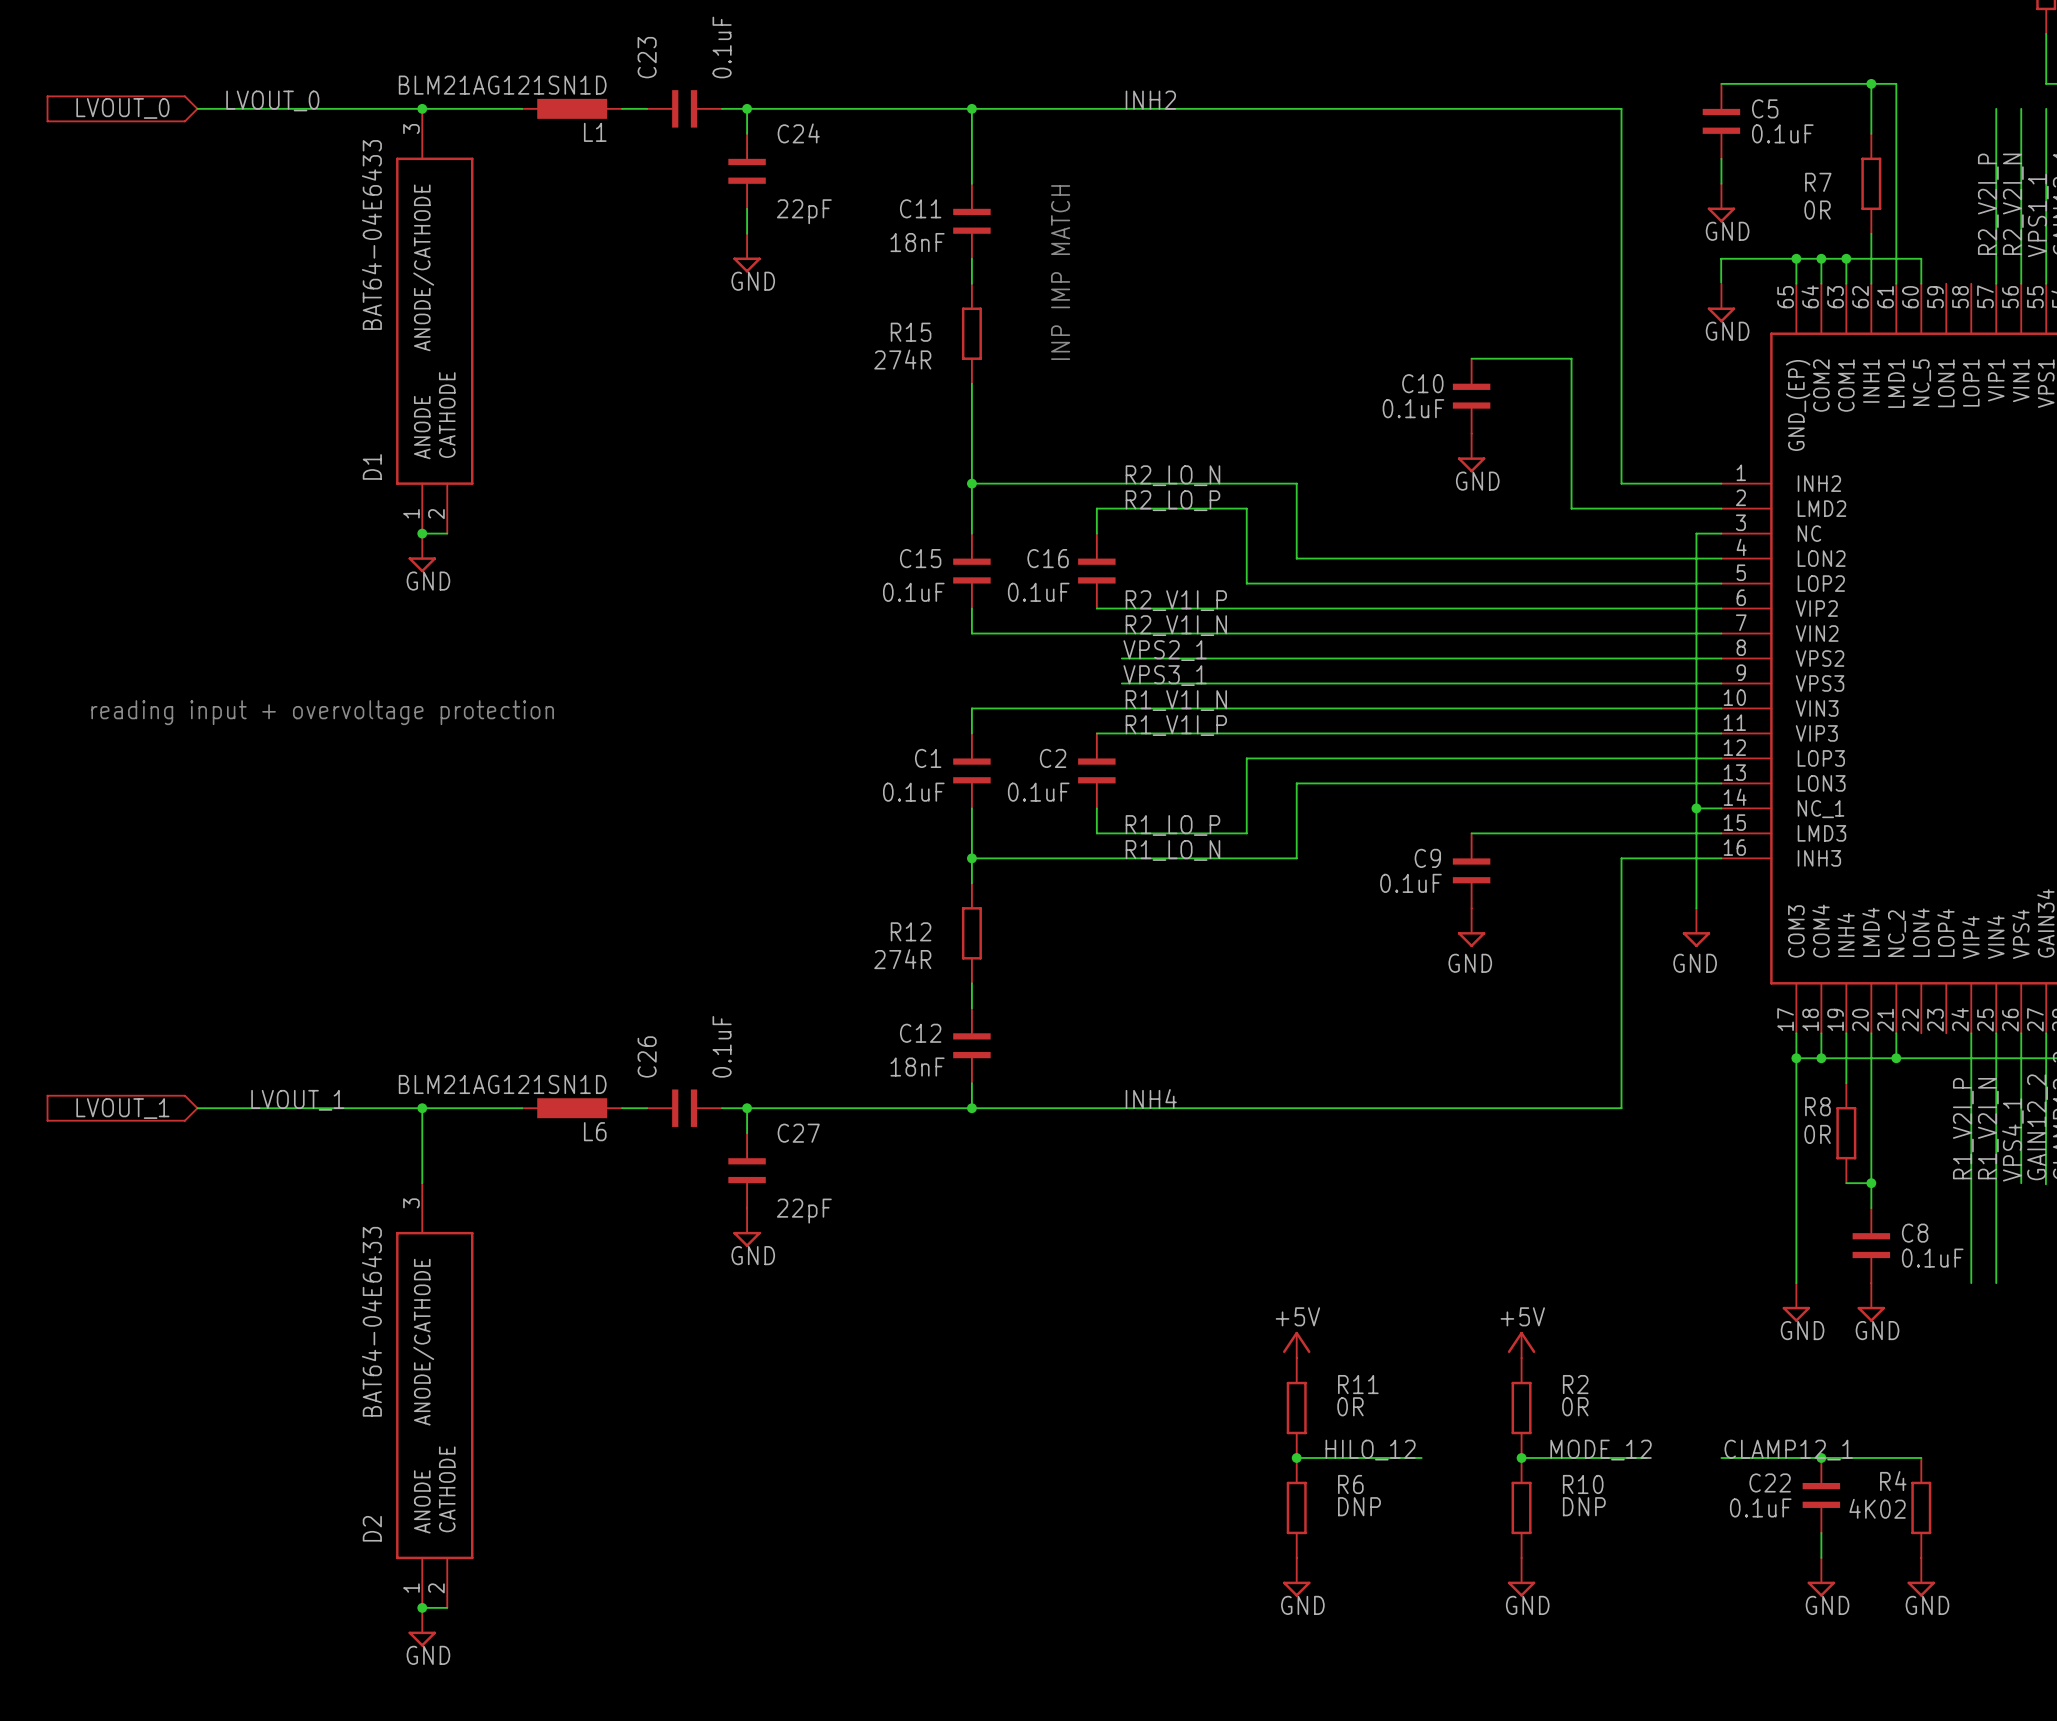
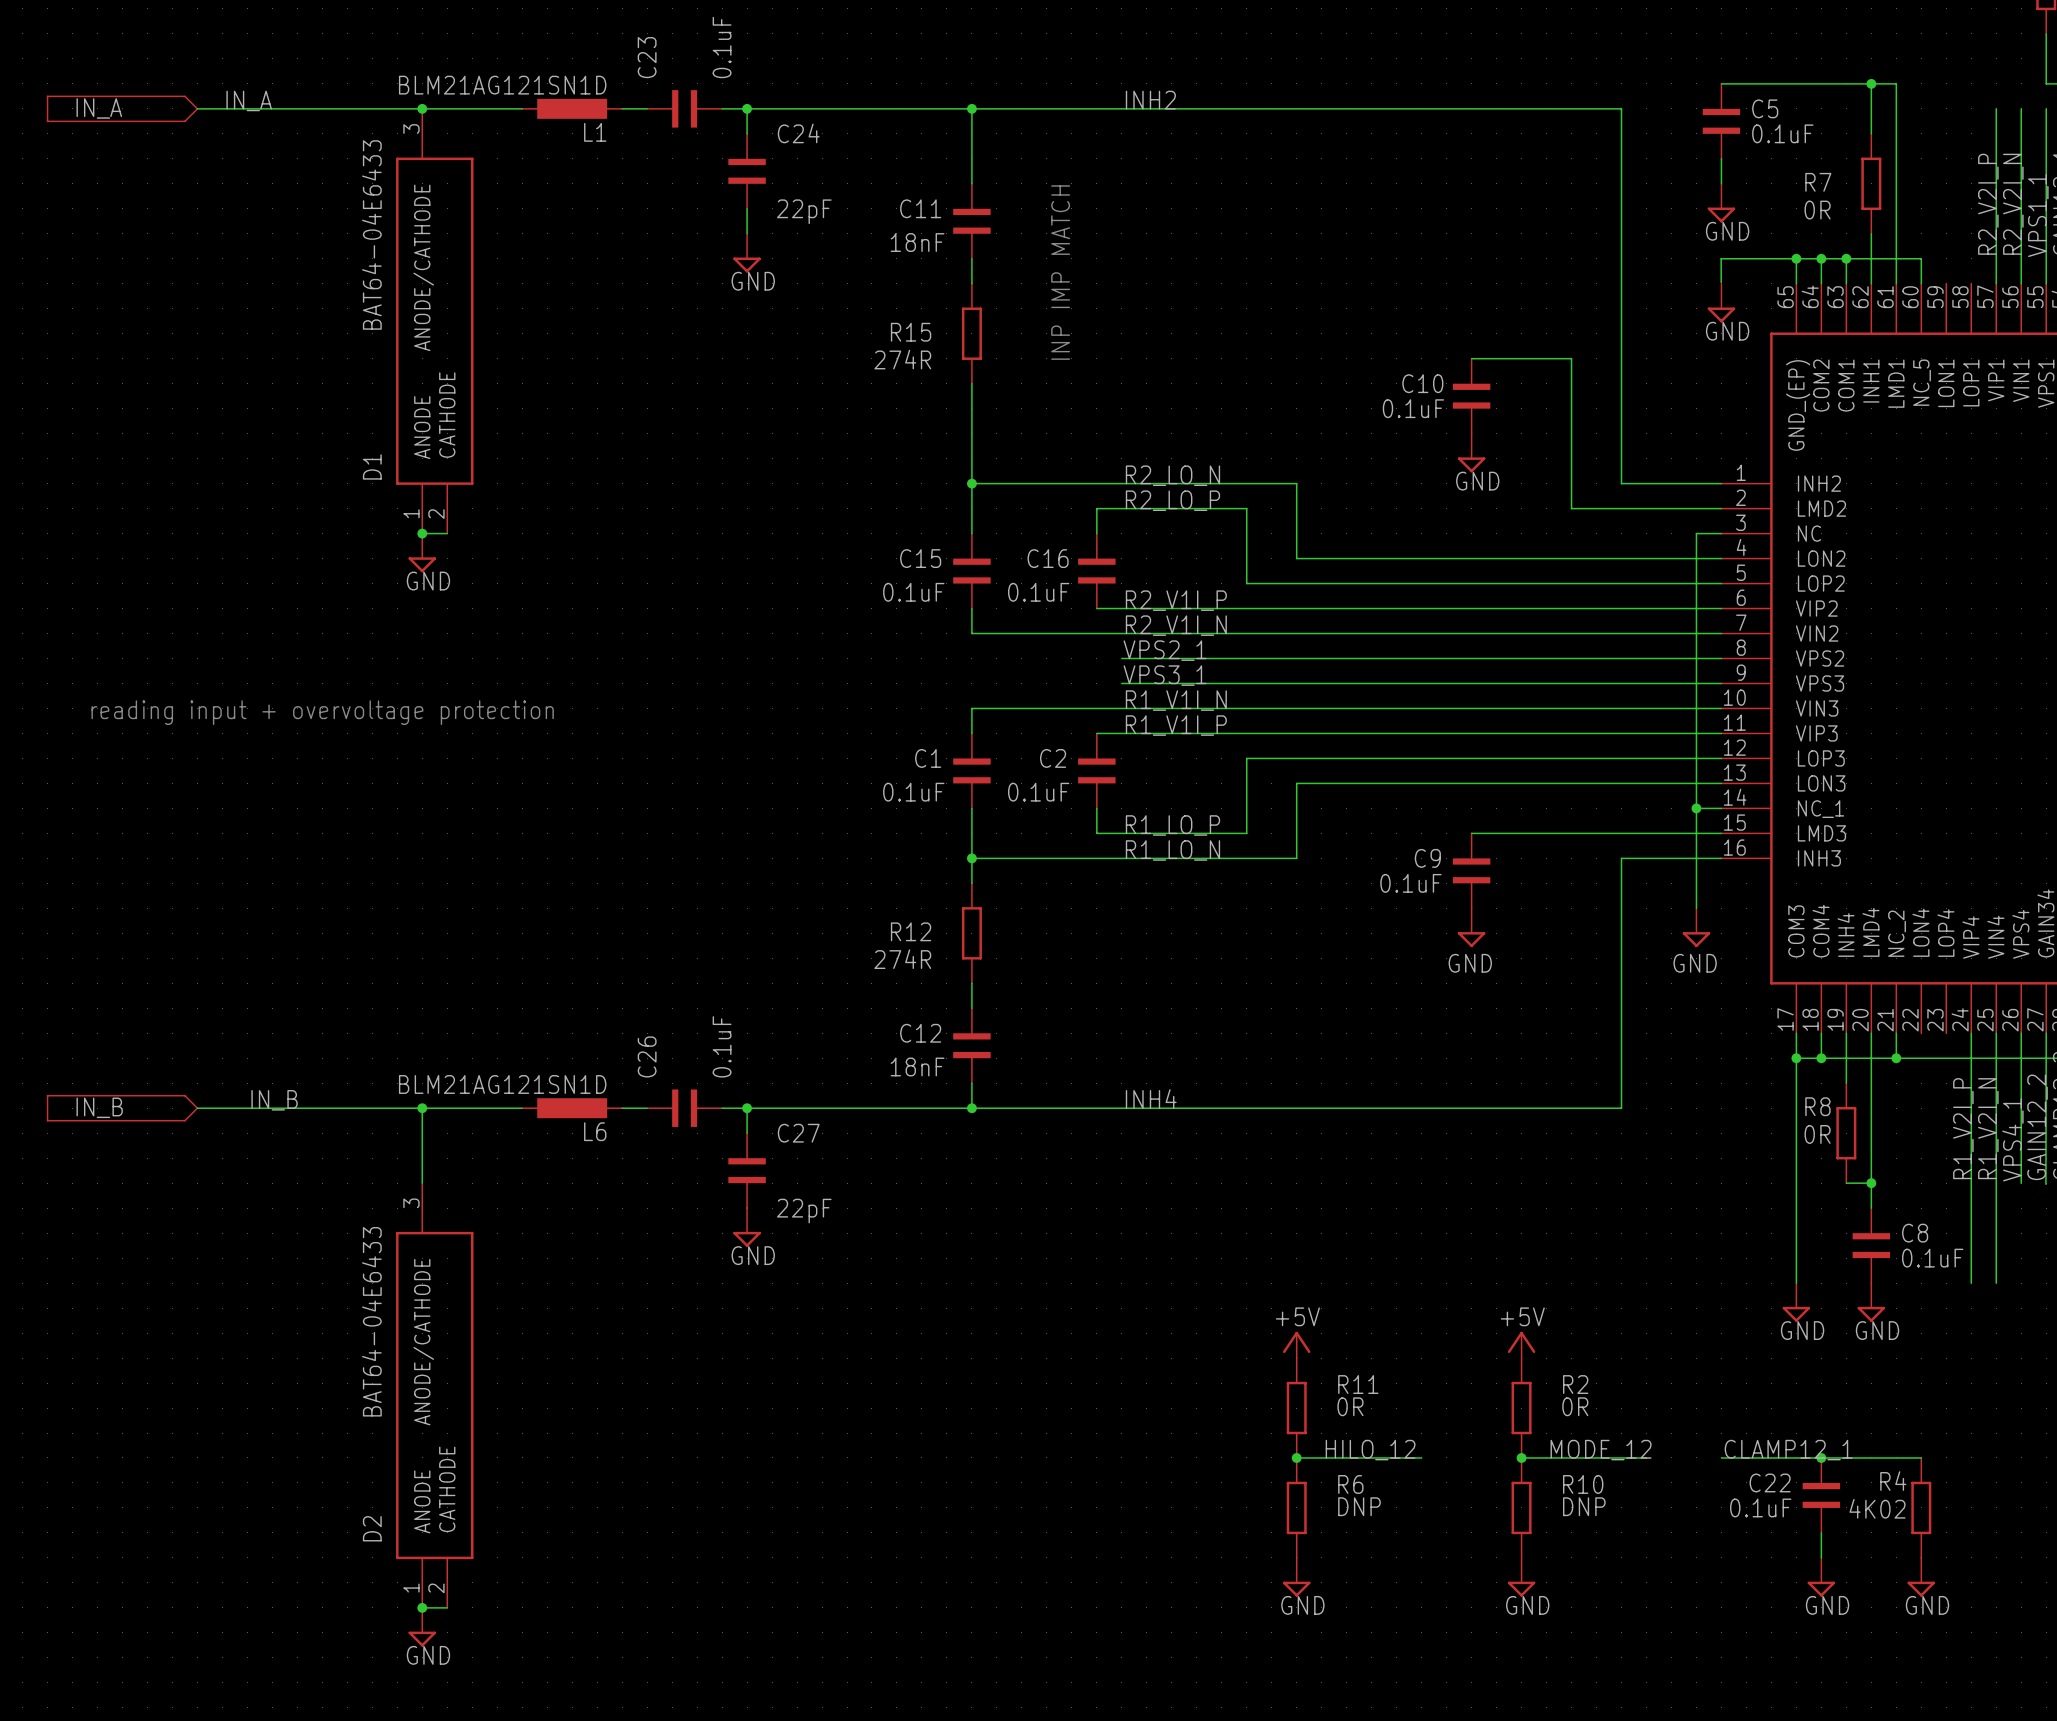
label: LVOUT_0 (272, 100) -> IN_A (249, 100)
part text: LVOUT_0 (122, 108) -> IN_A (99, 108)
label: LVOUT_1 (297, 1100) -> IN_B (274, 1100)
part text: none -> IN_B (99, 1107)
label: LVOUT_1 (122, 1108) -> none

